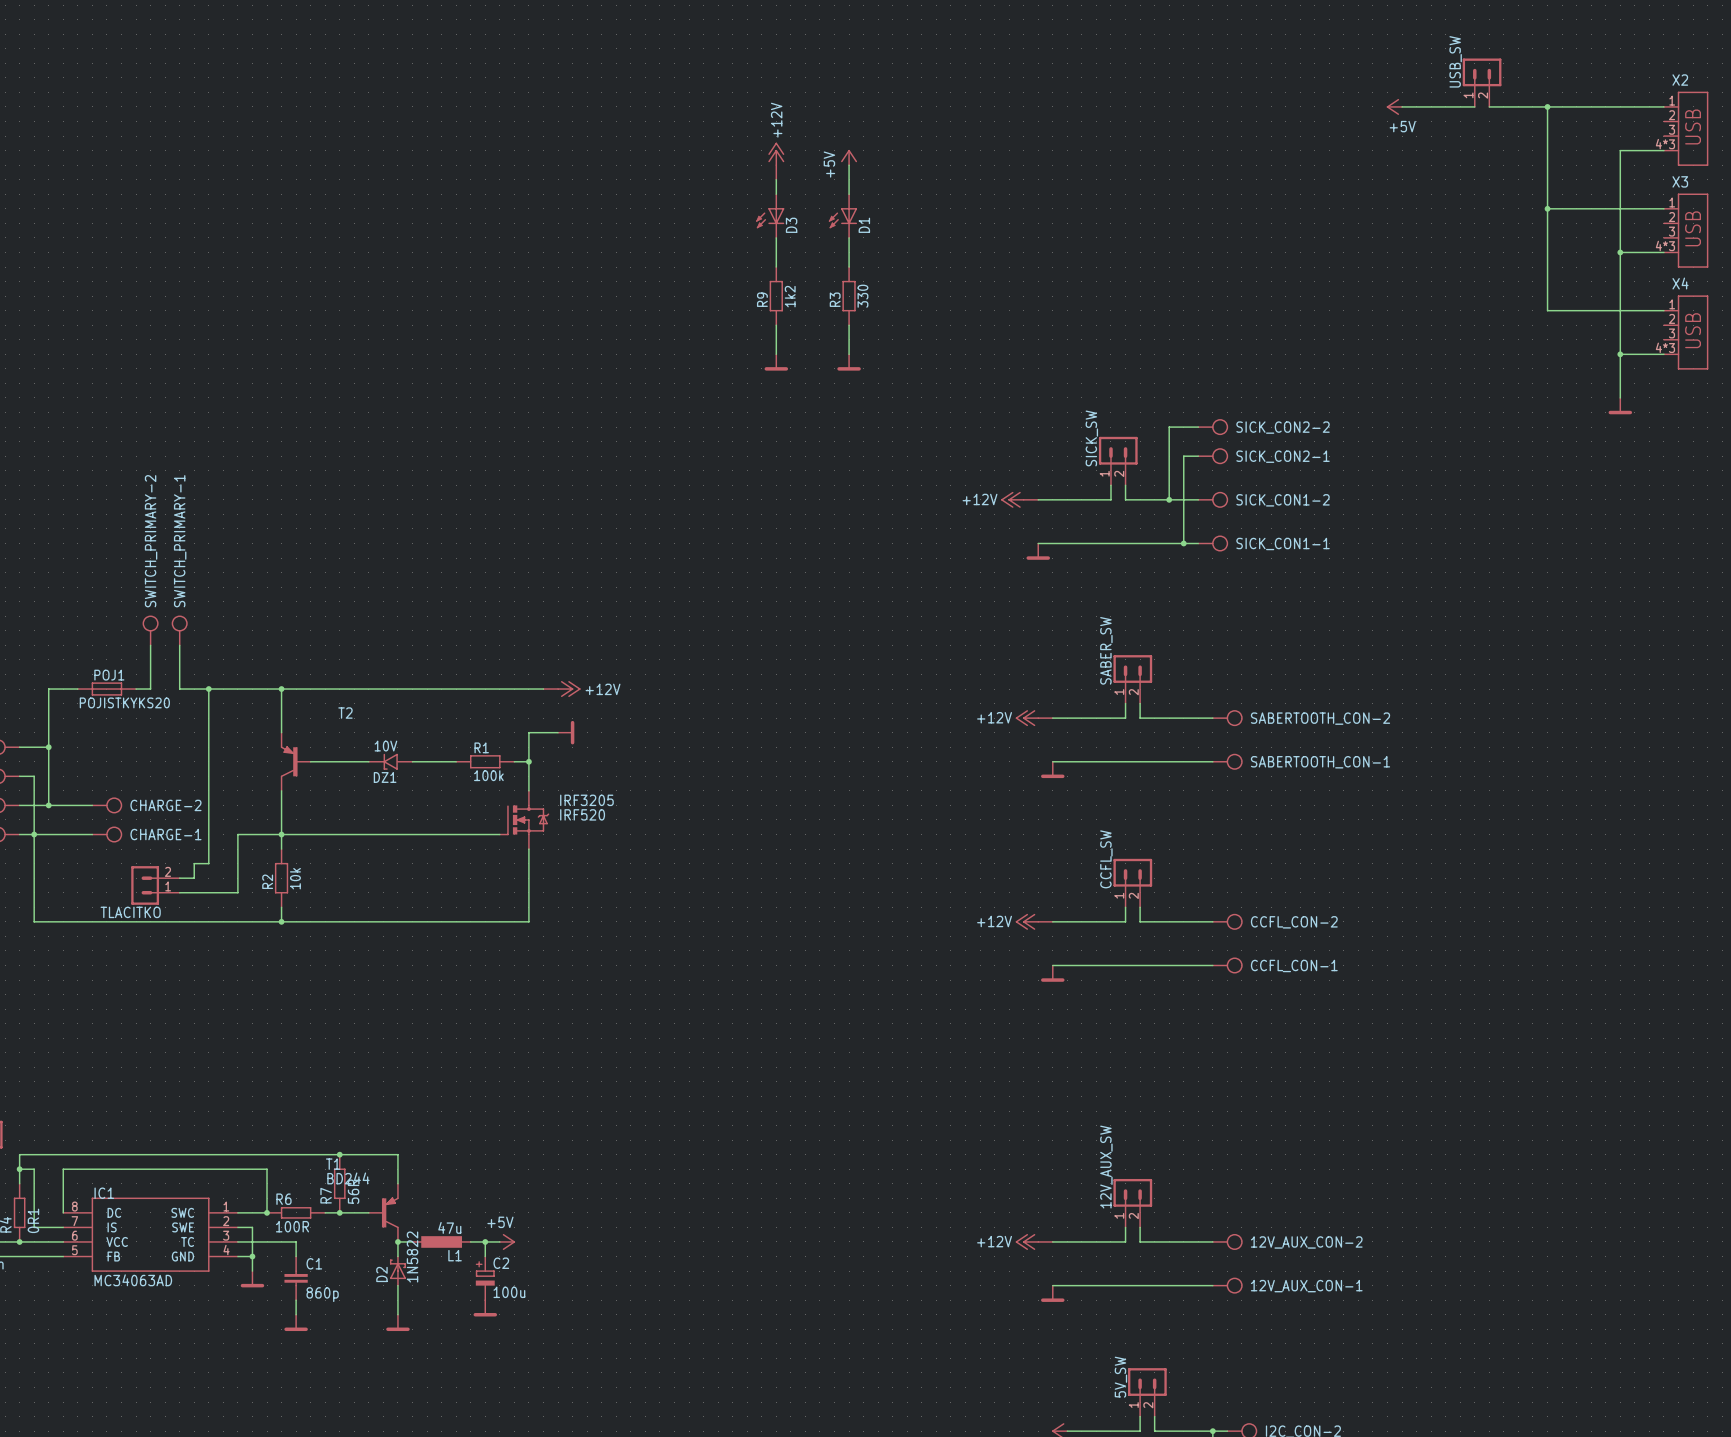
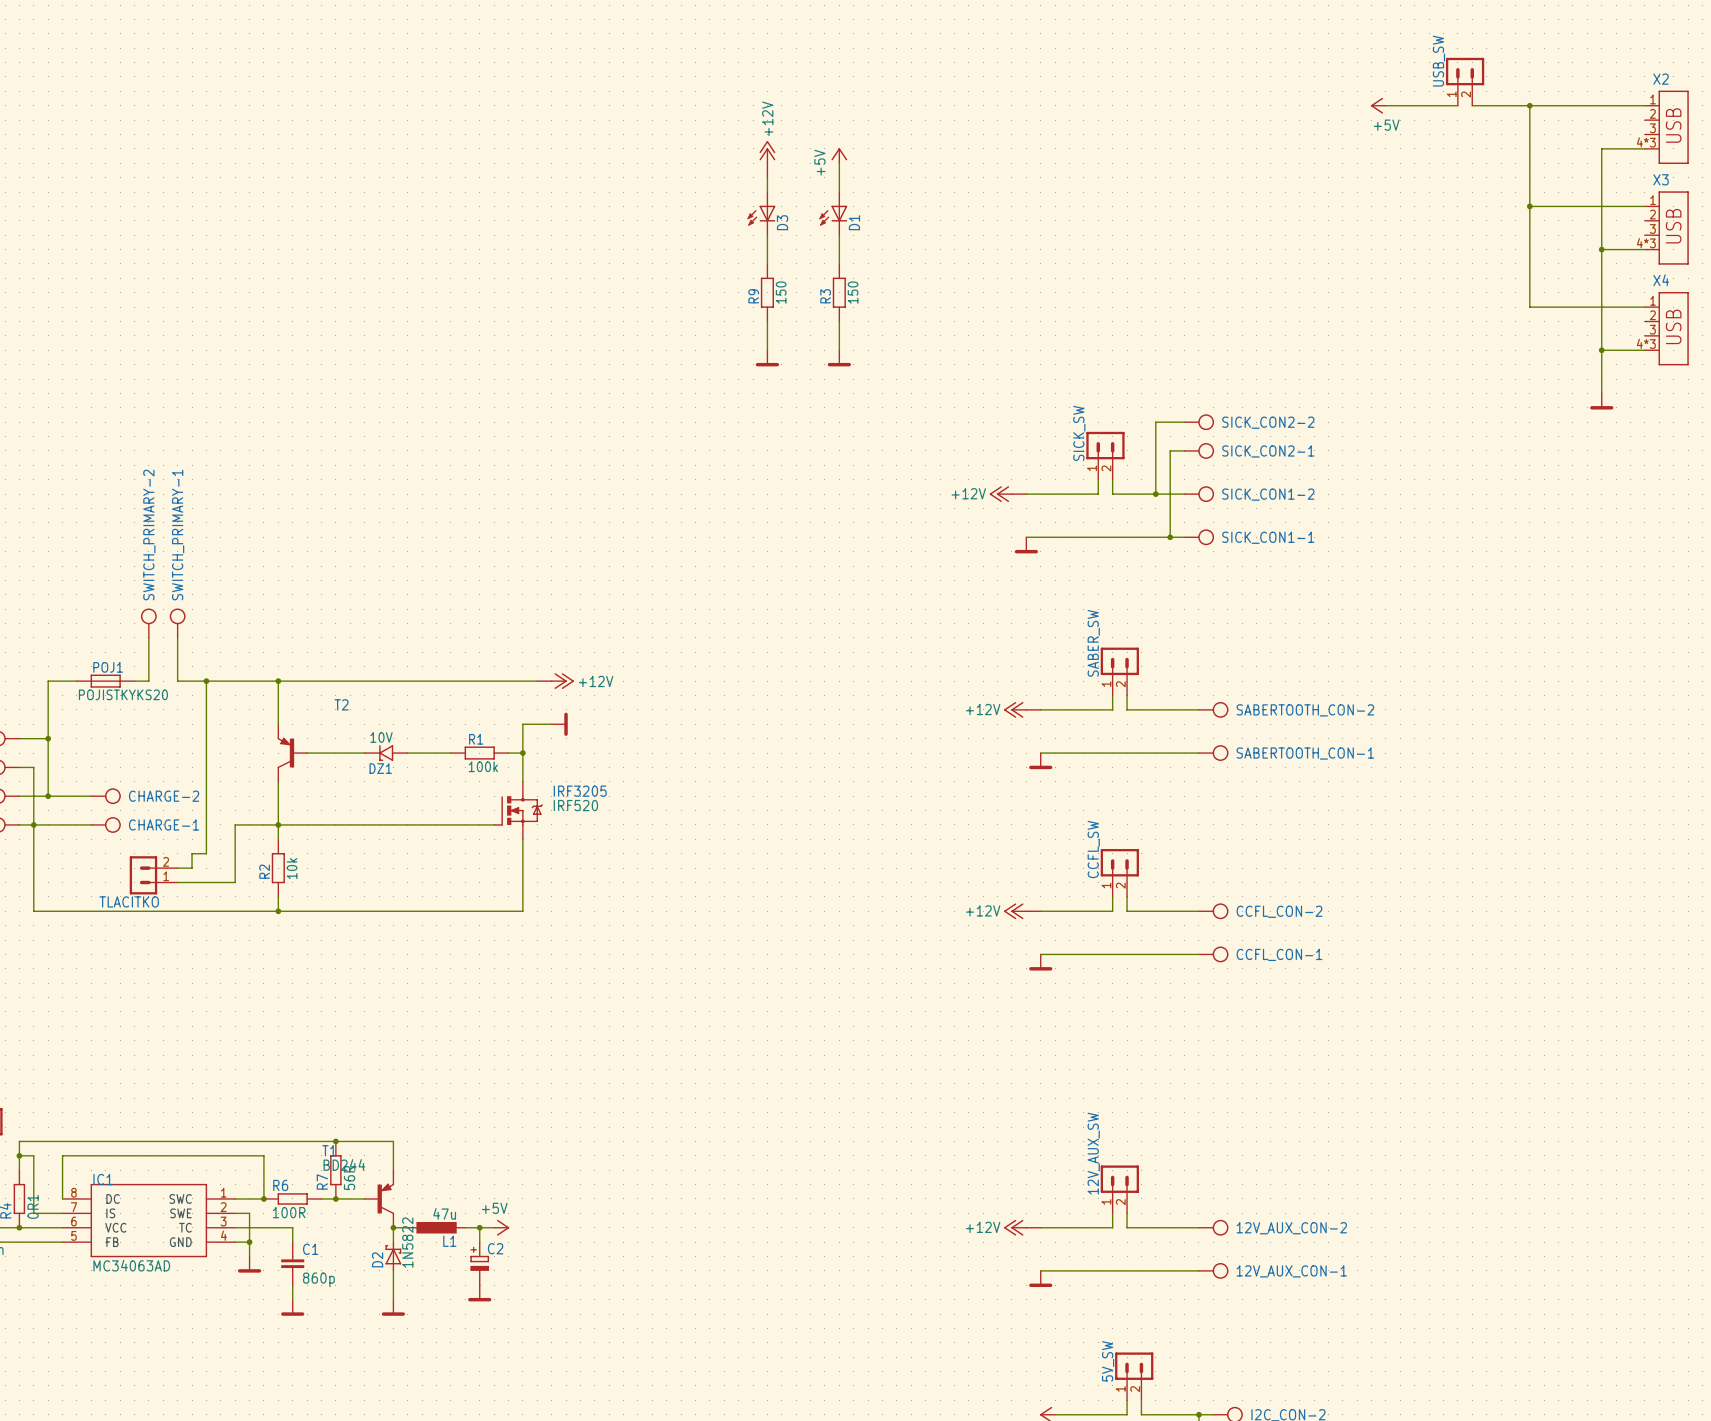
R9 value: 1k2 (790, 296) -> 150 (781, 292)
R3 value: 330 (862, 296) -> 150 (853, 292)
C2 value: 100u (509, 1292) -> none

